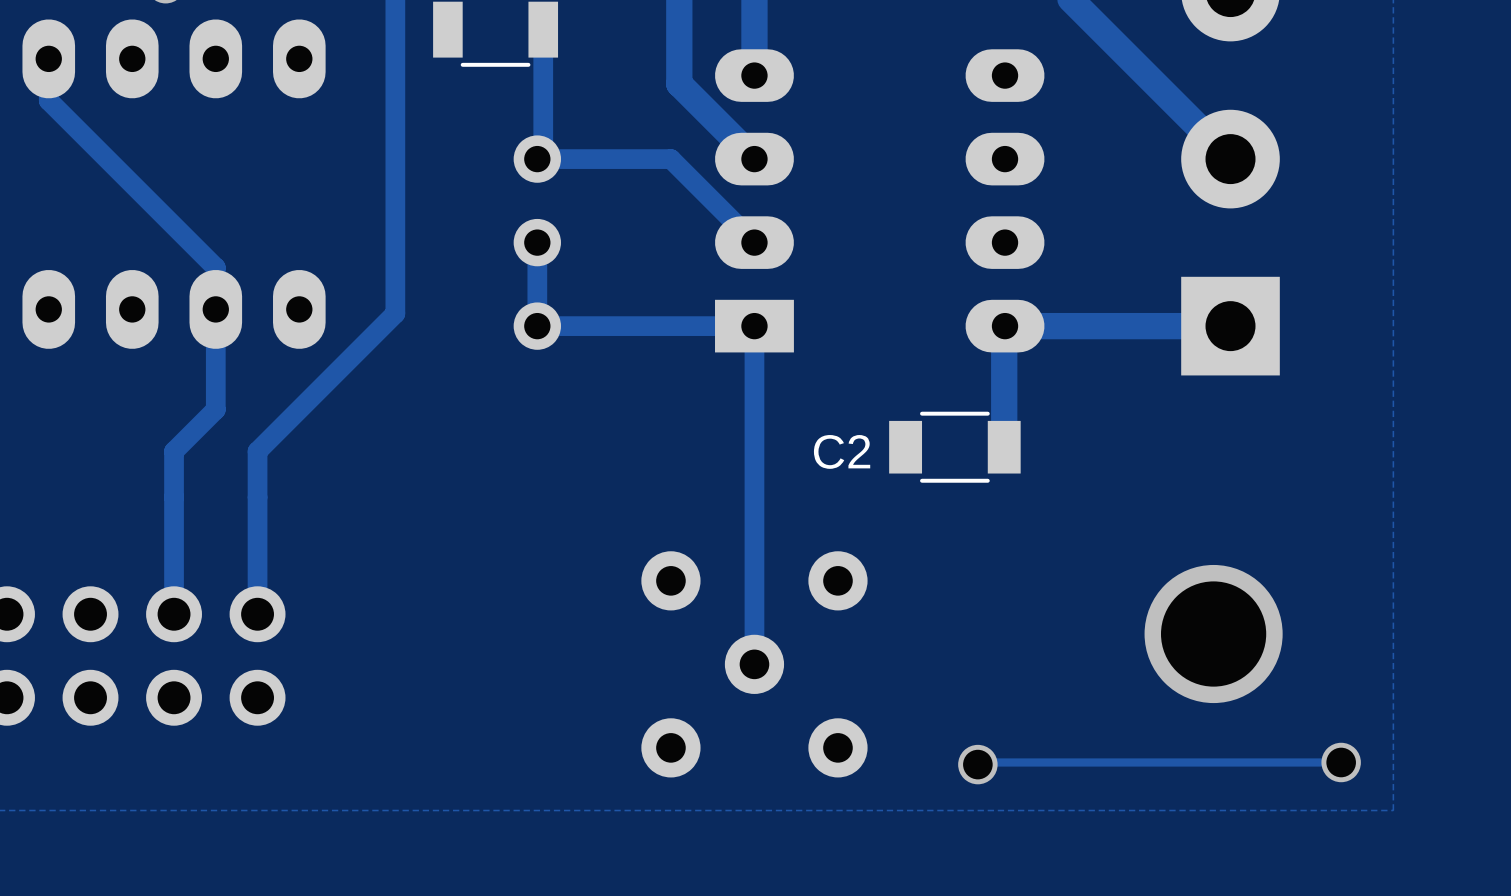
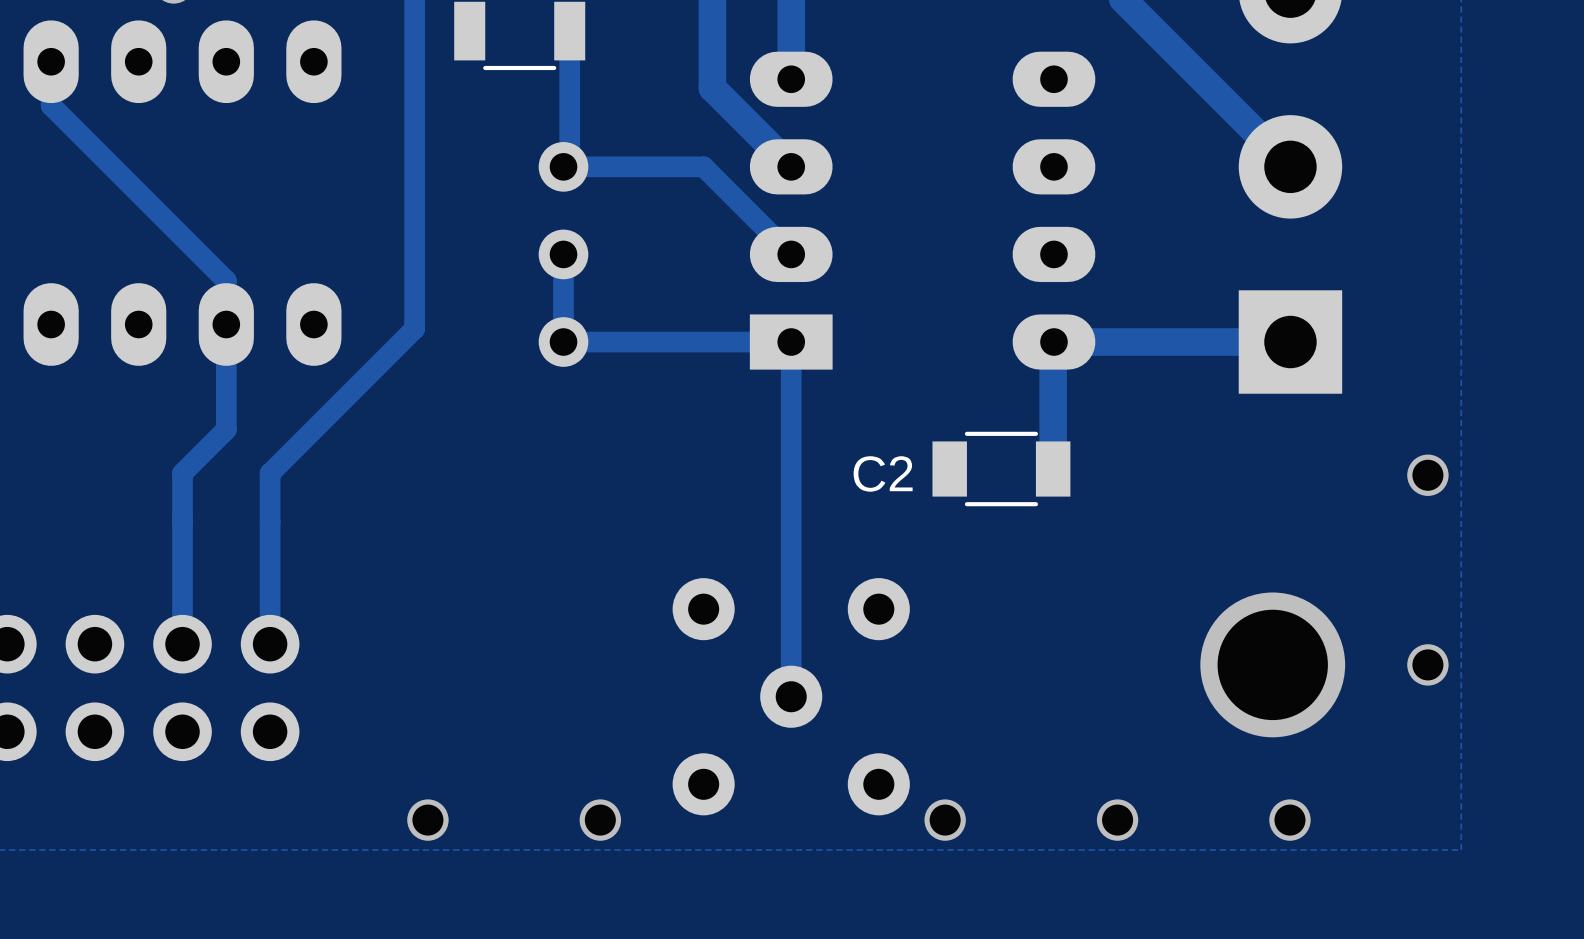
via: none -> (1427, 475)
via: none -> (1427, 664)
track: (1341, 762) (979, 762) (977, 764) -> none
via: (1341, 762) -> none
via: (977, 764) -> none
via: none -> (427, 820)
via: none -> (600, 820)
via: none -> (945, 820)
via: none -> (1117, 820)
via: none -> (1289, 820)

